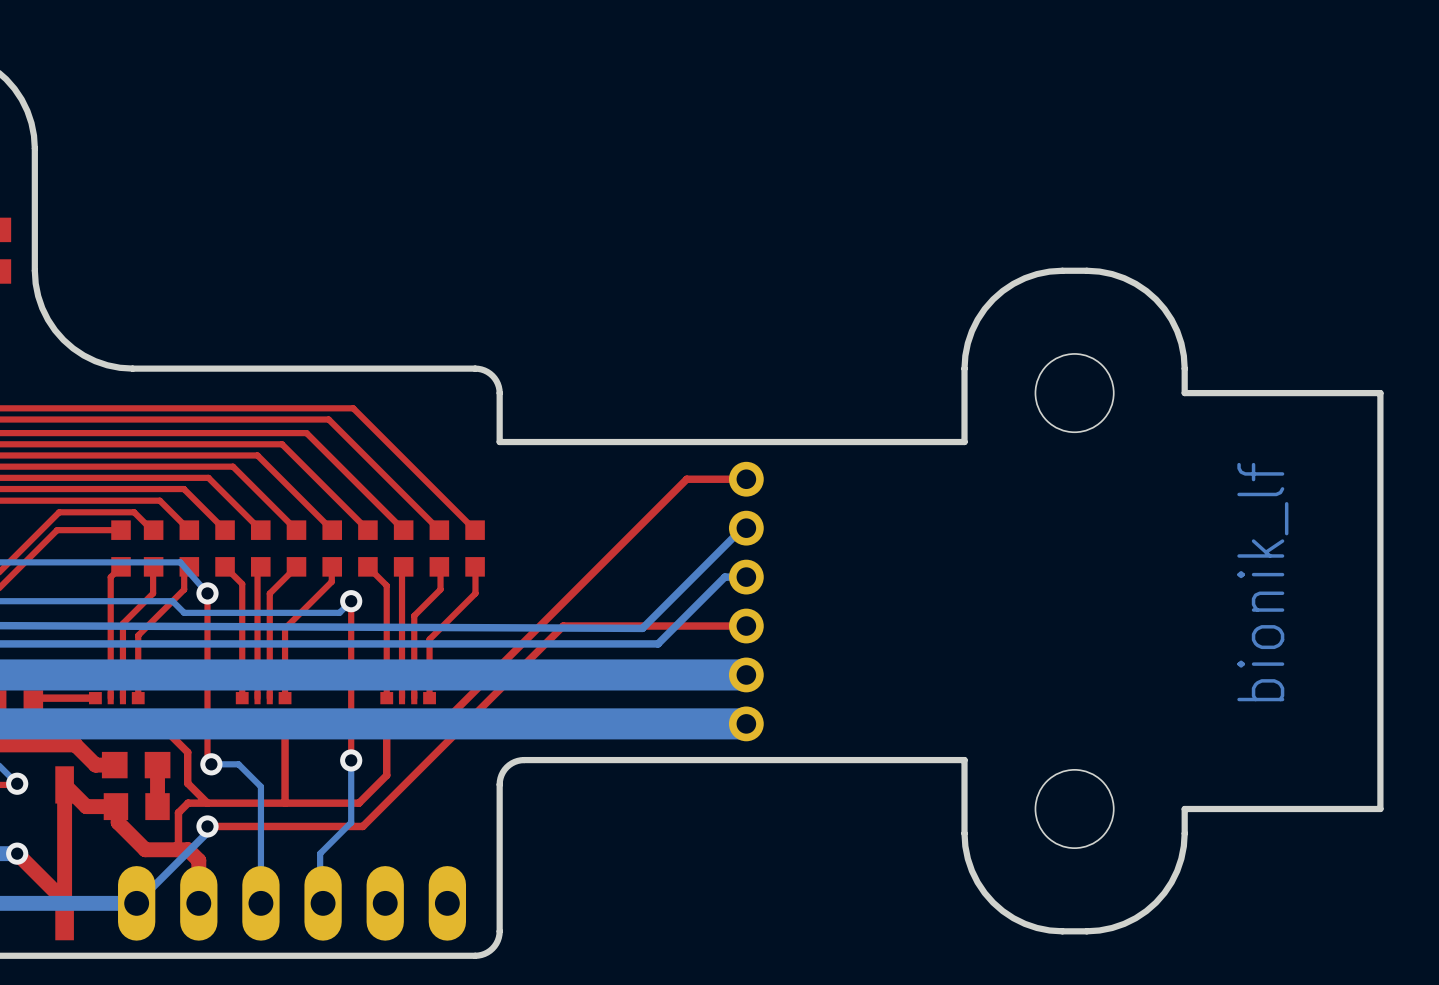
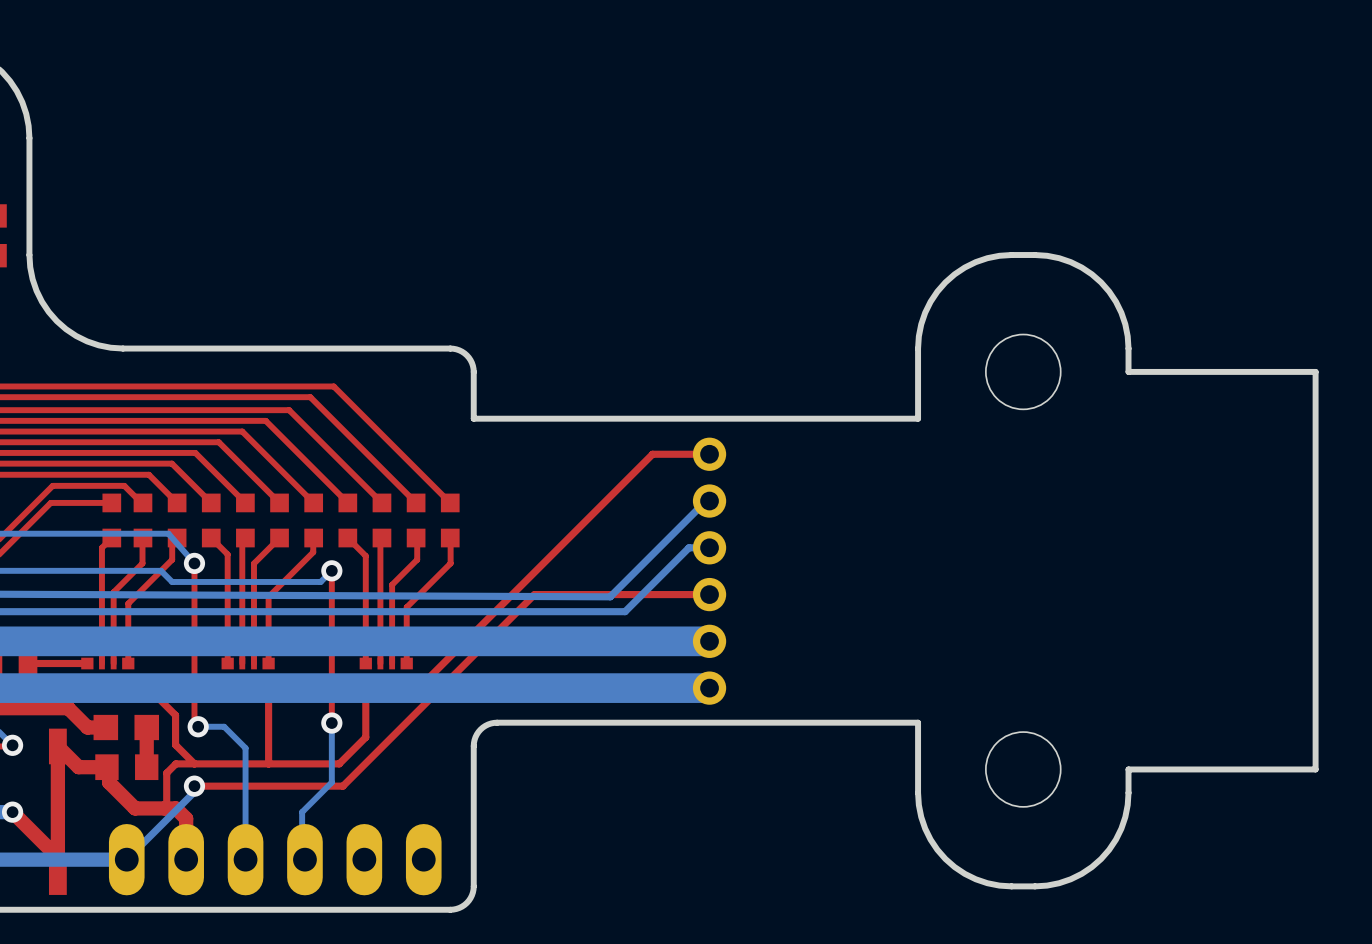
text: bionik_lf (1262, 582) -> none

